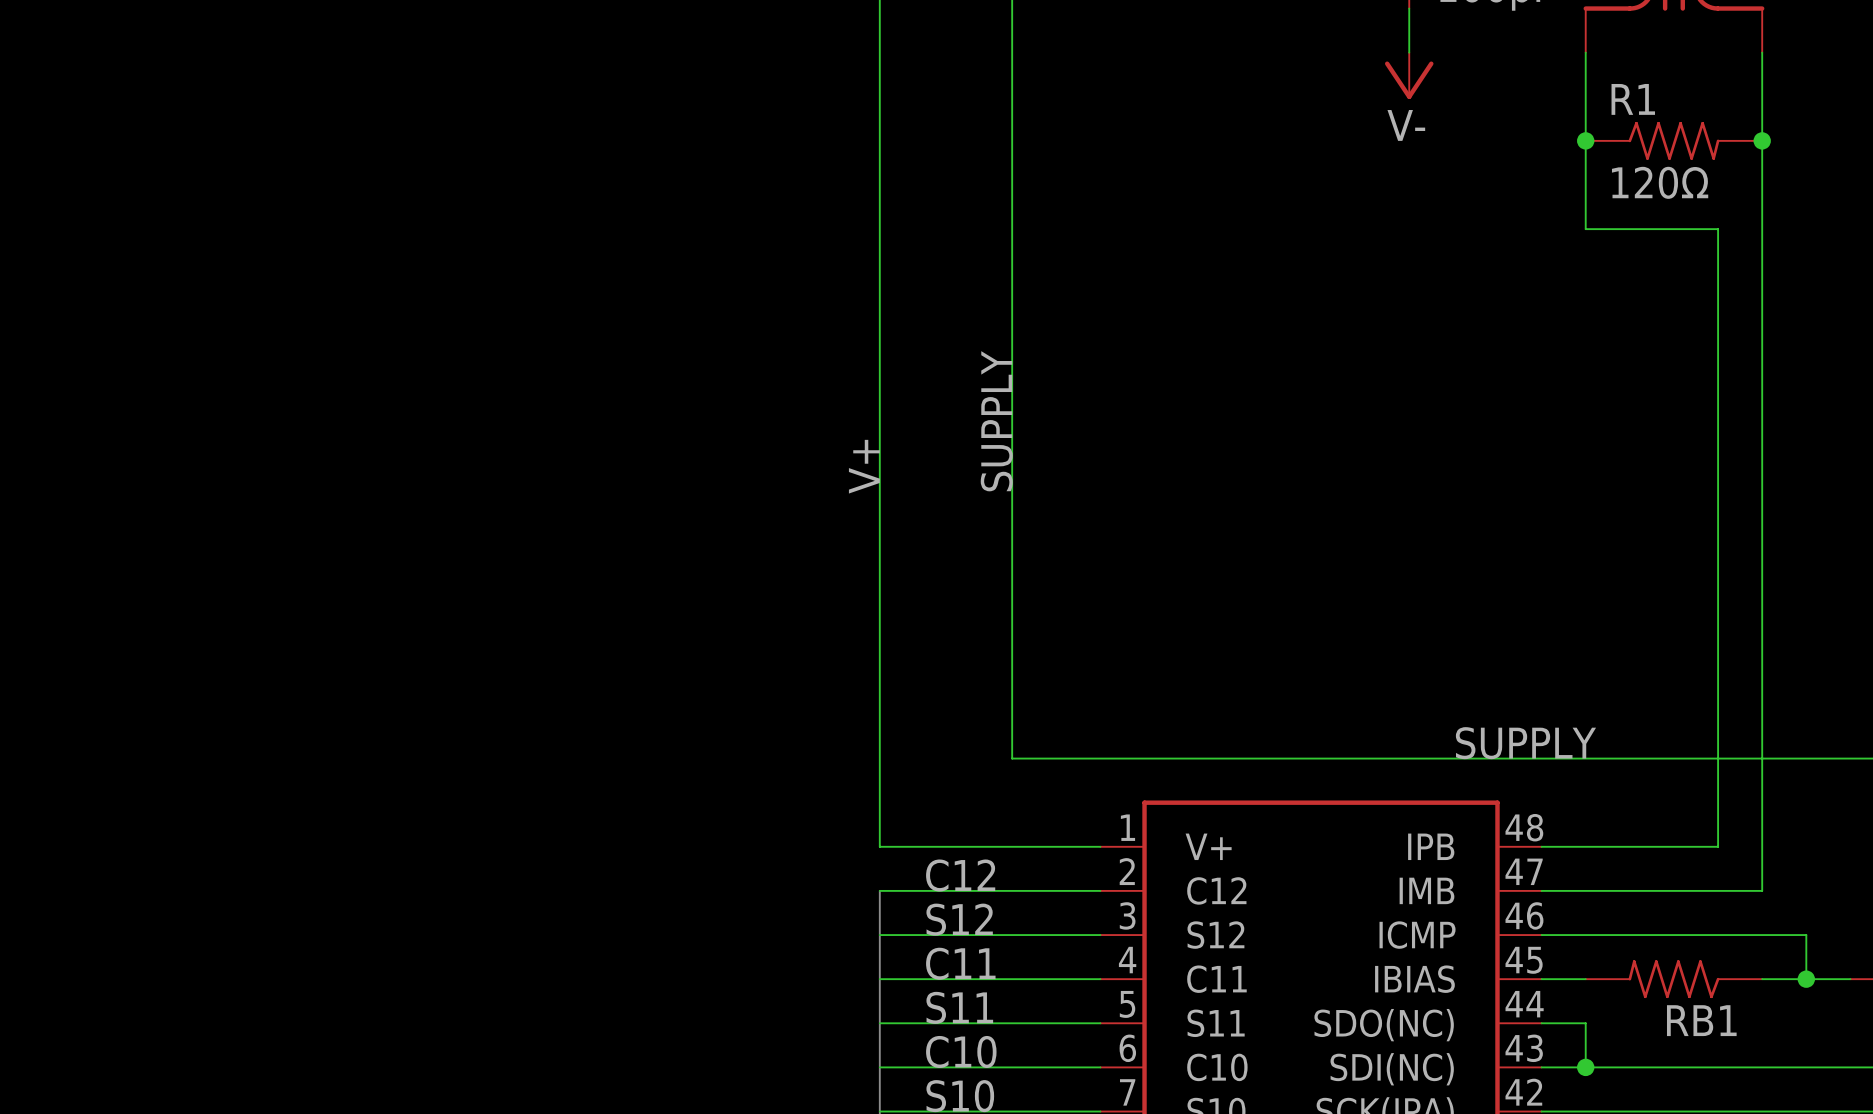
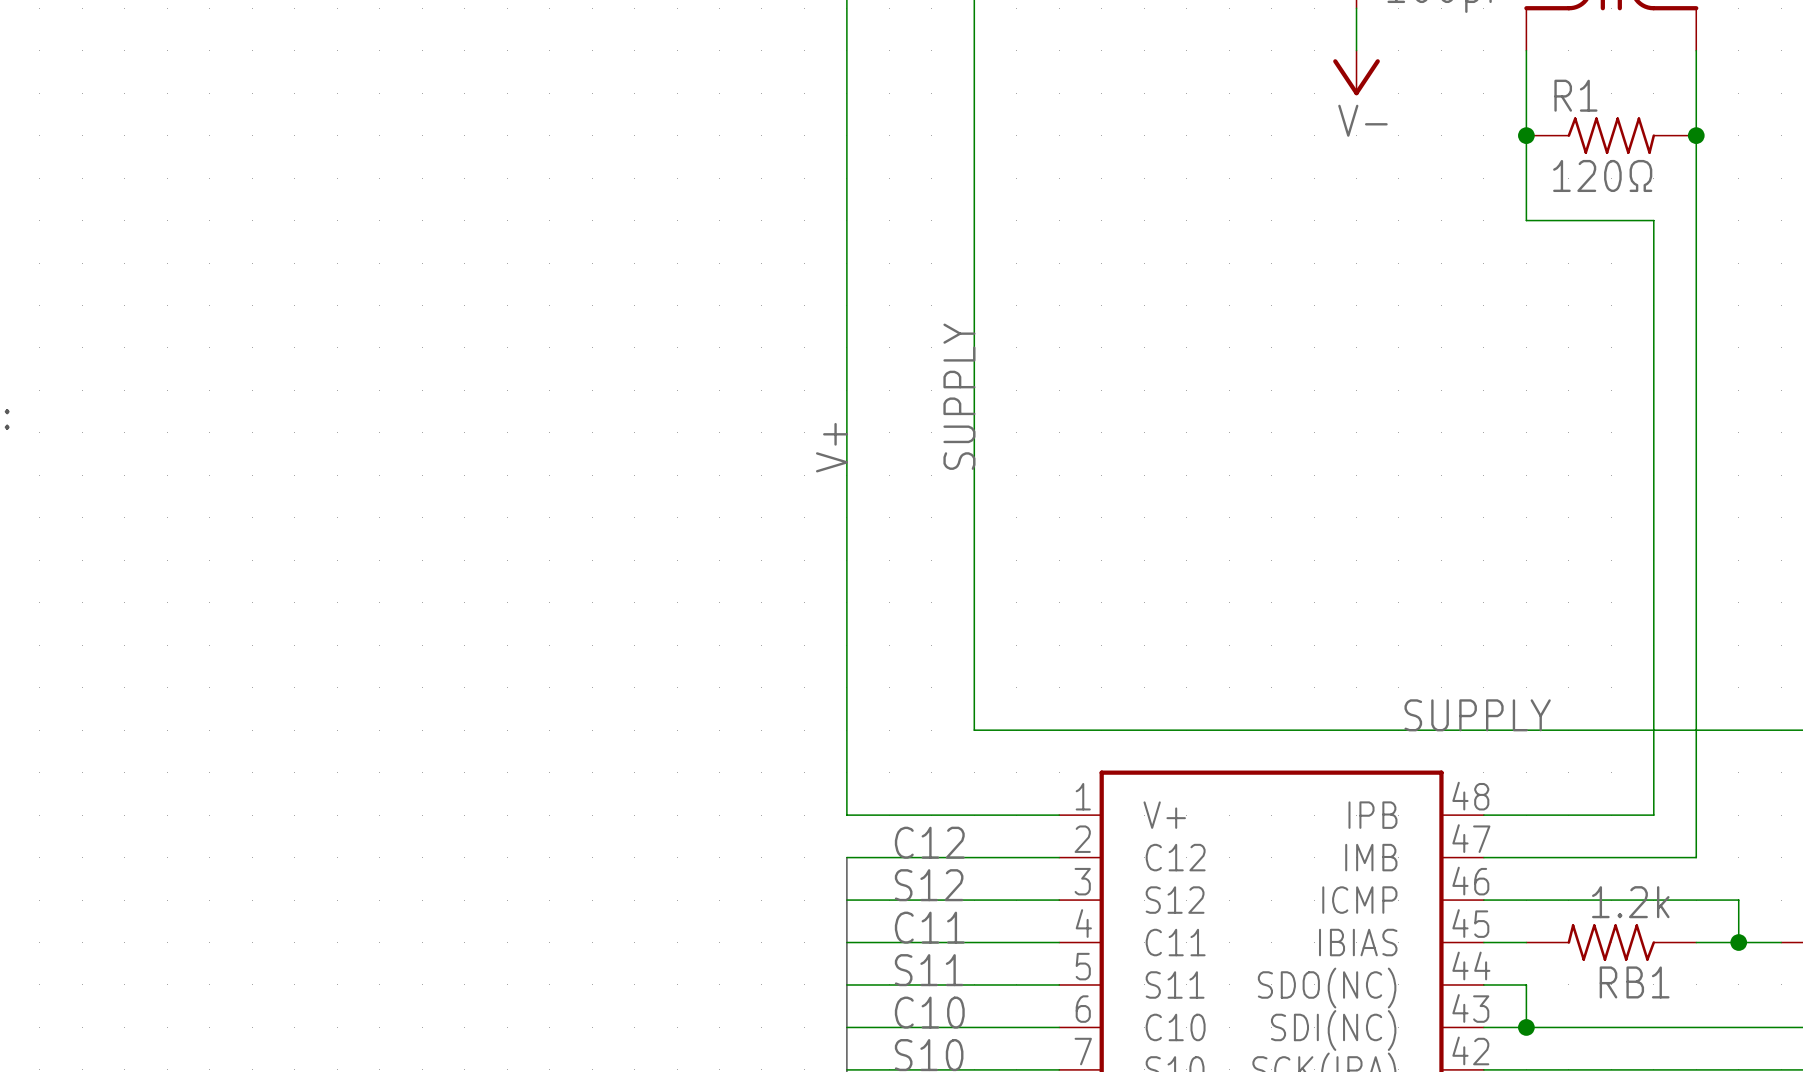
RB1 value: none -> 1.2k (1630, 902)

